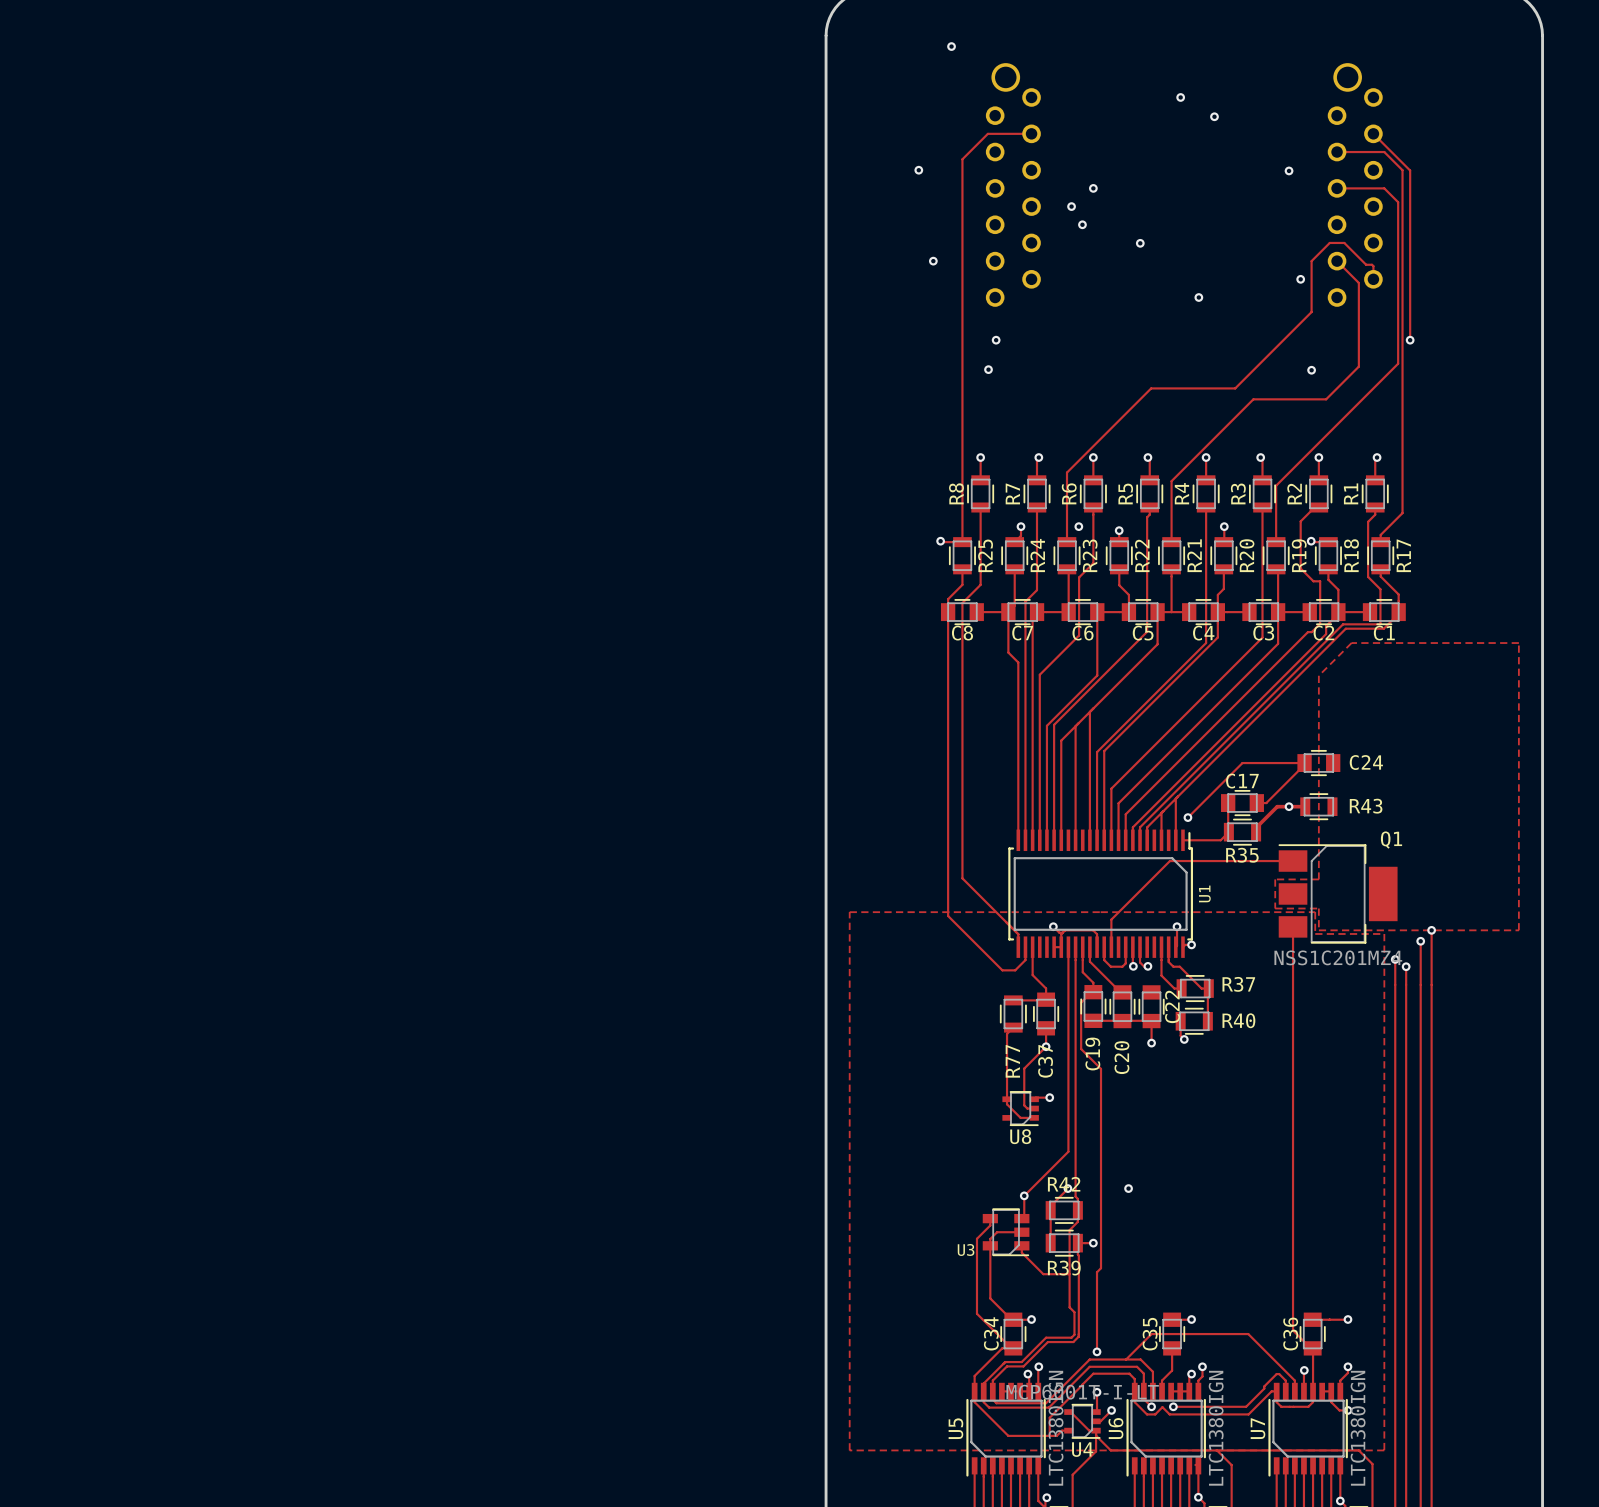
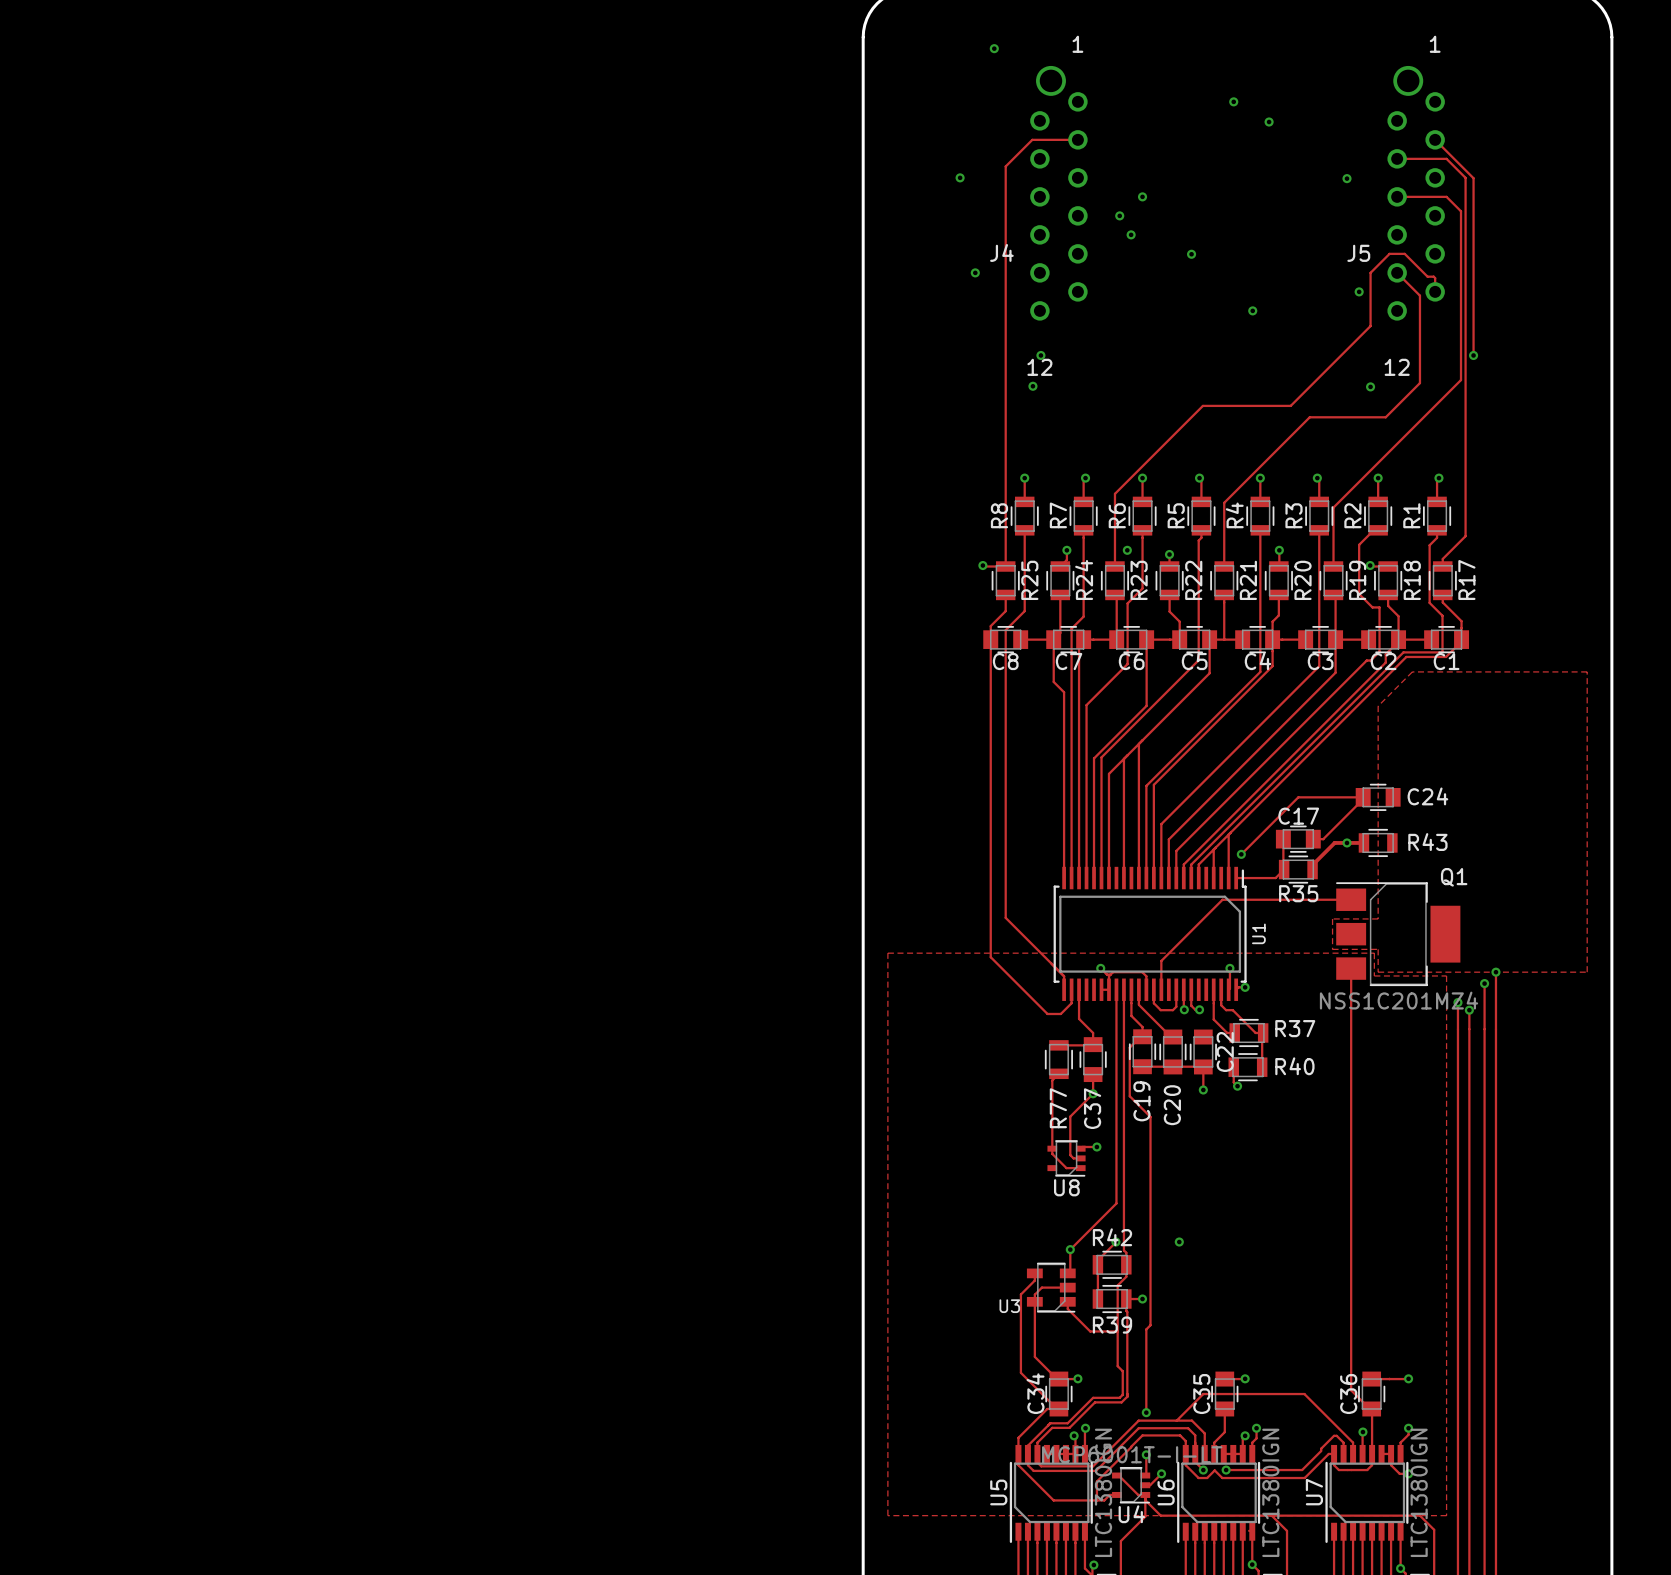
J4 text: none -> 1 (1077, 44)
J5 text: none -> 1 (1435, 44)
J4 name: none -> J4 (1001, 252)
J5 name: none -> J5 (1358, 253)
J4 text: none -> 12 (1039, 367)
J5 text: none -> 12 (1397, 367)

